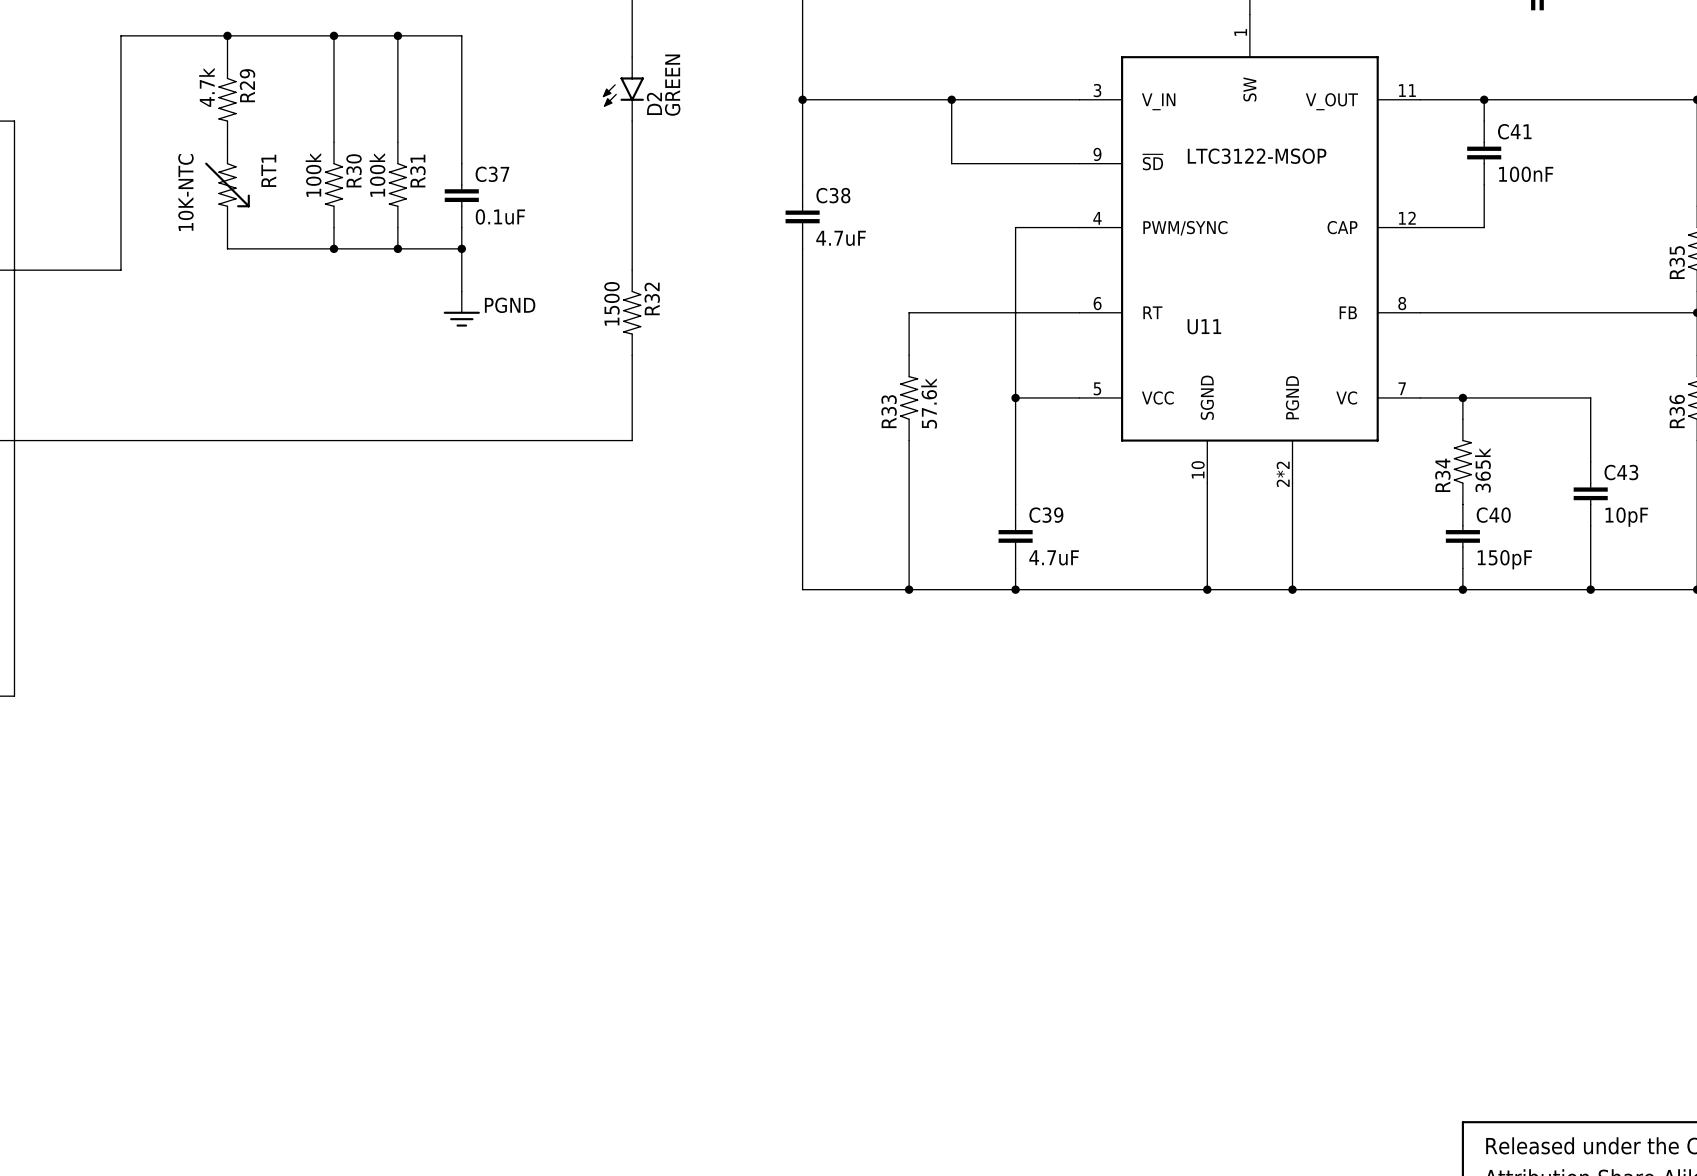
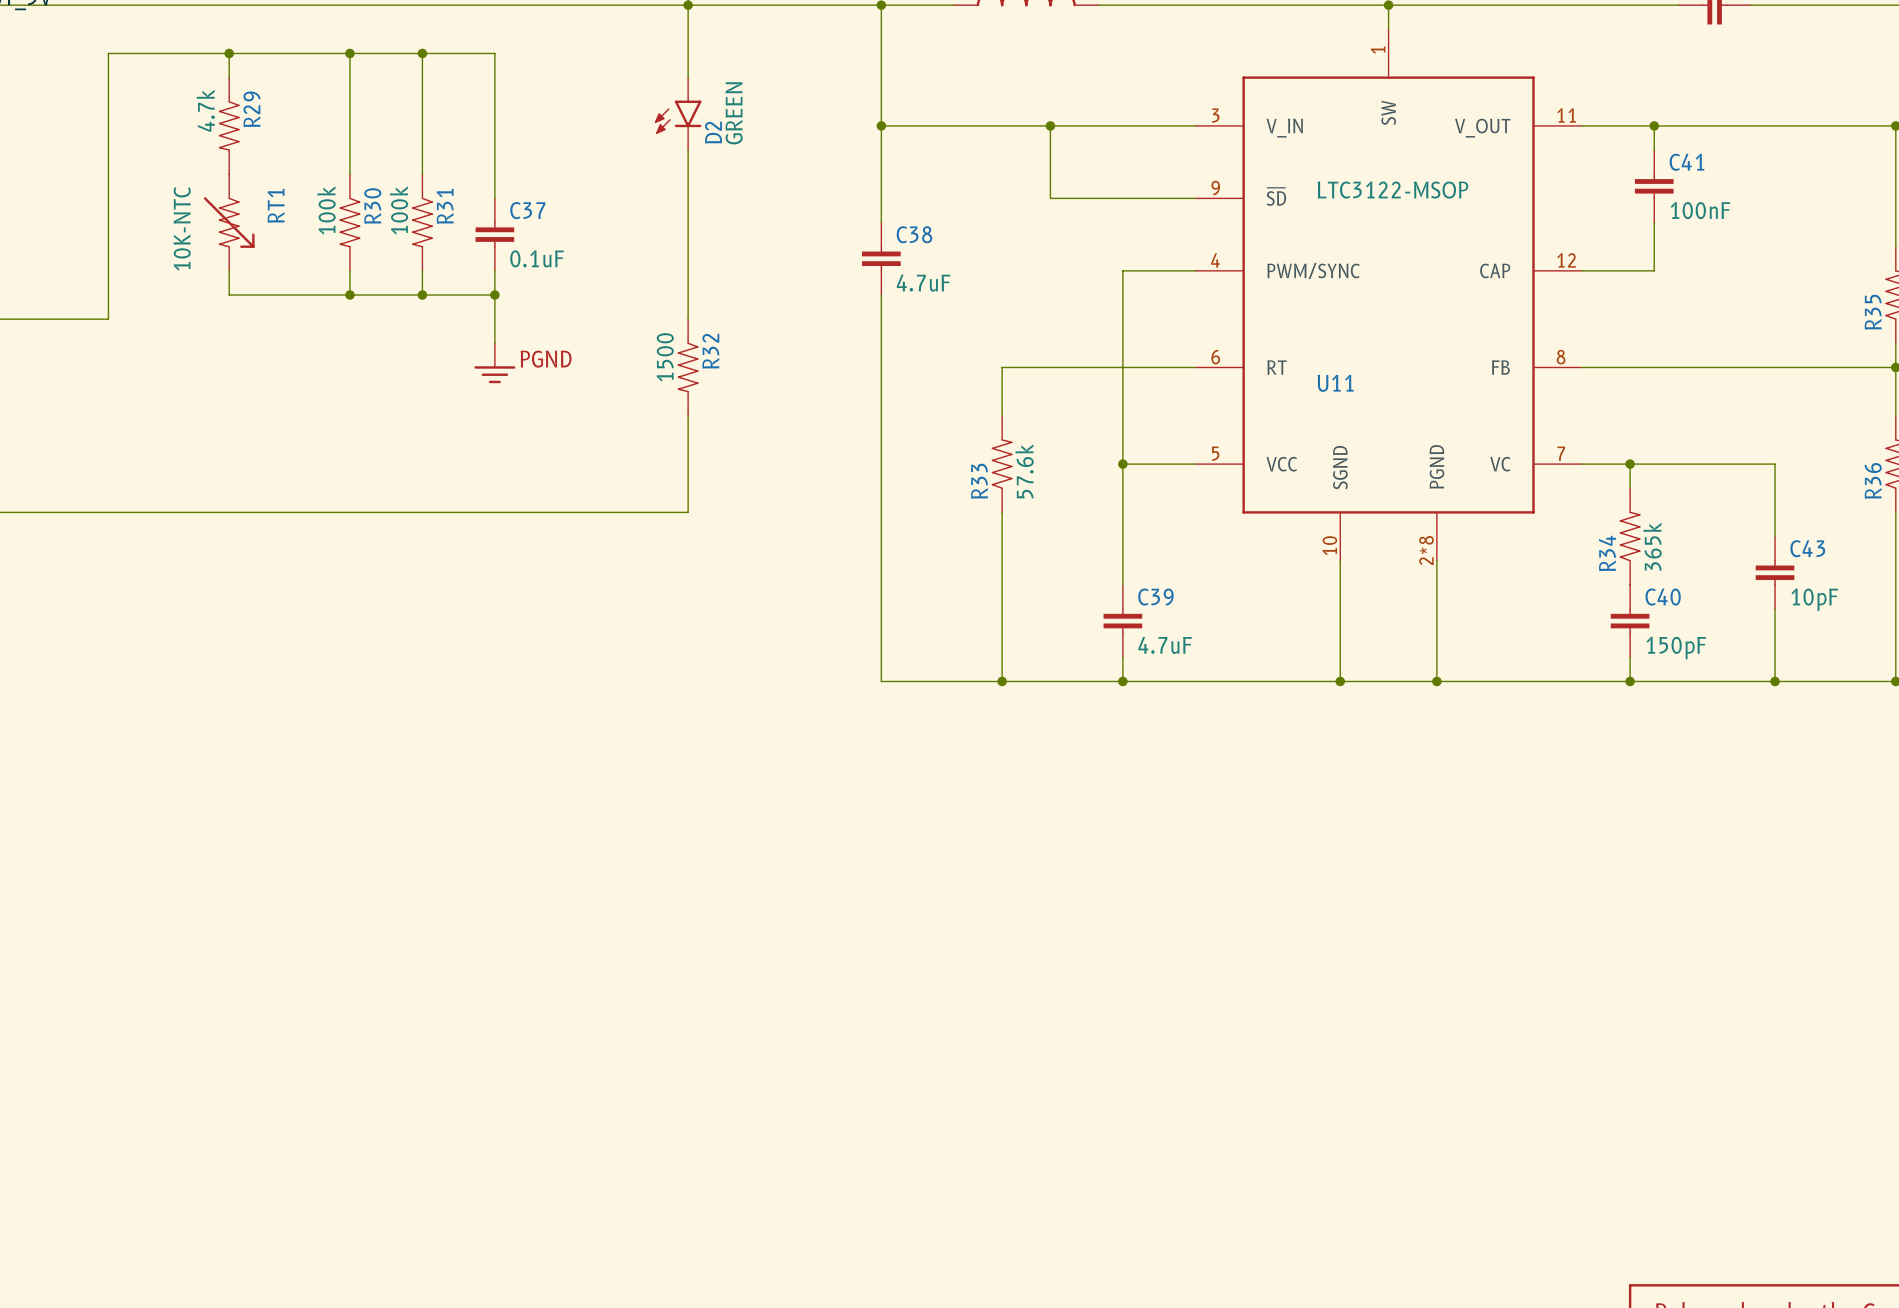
U11 pin number: 2*2 (1283, 474) -> 2*8 (1426, 550)

